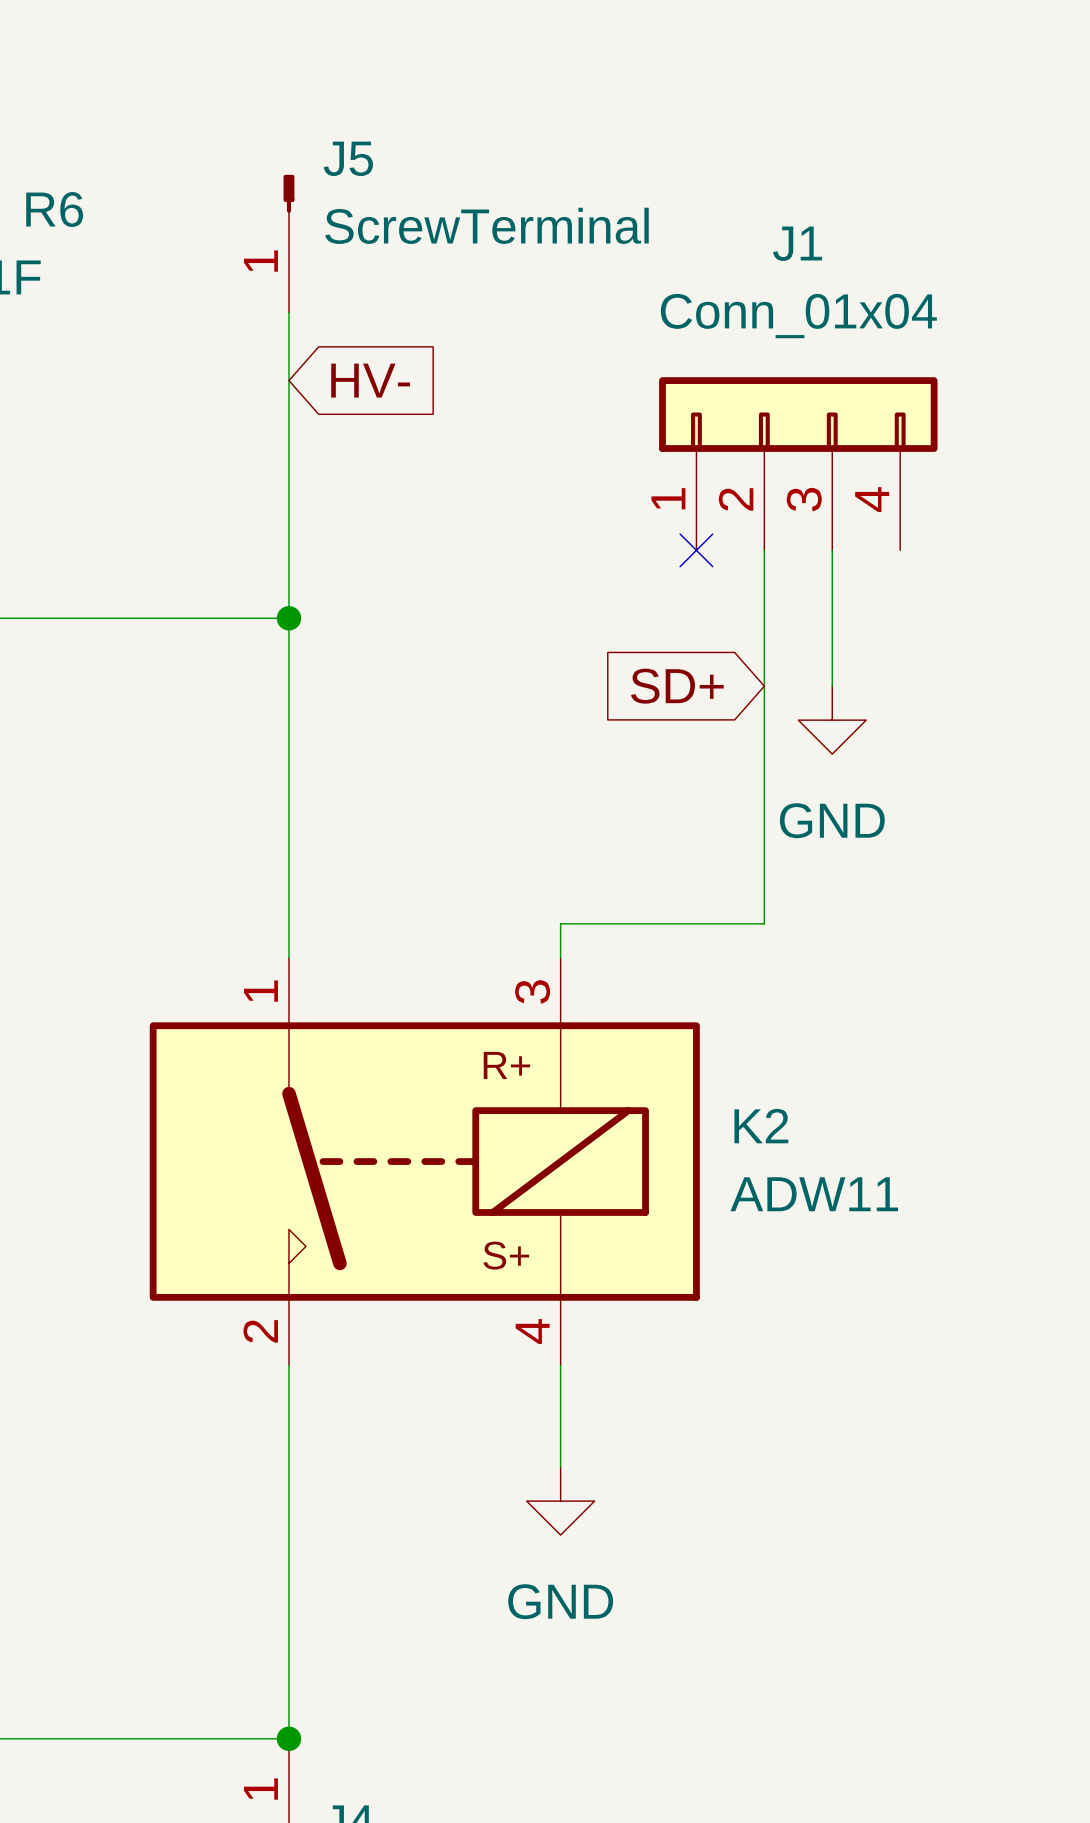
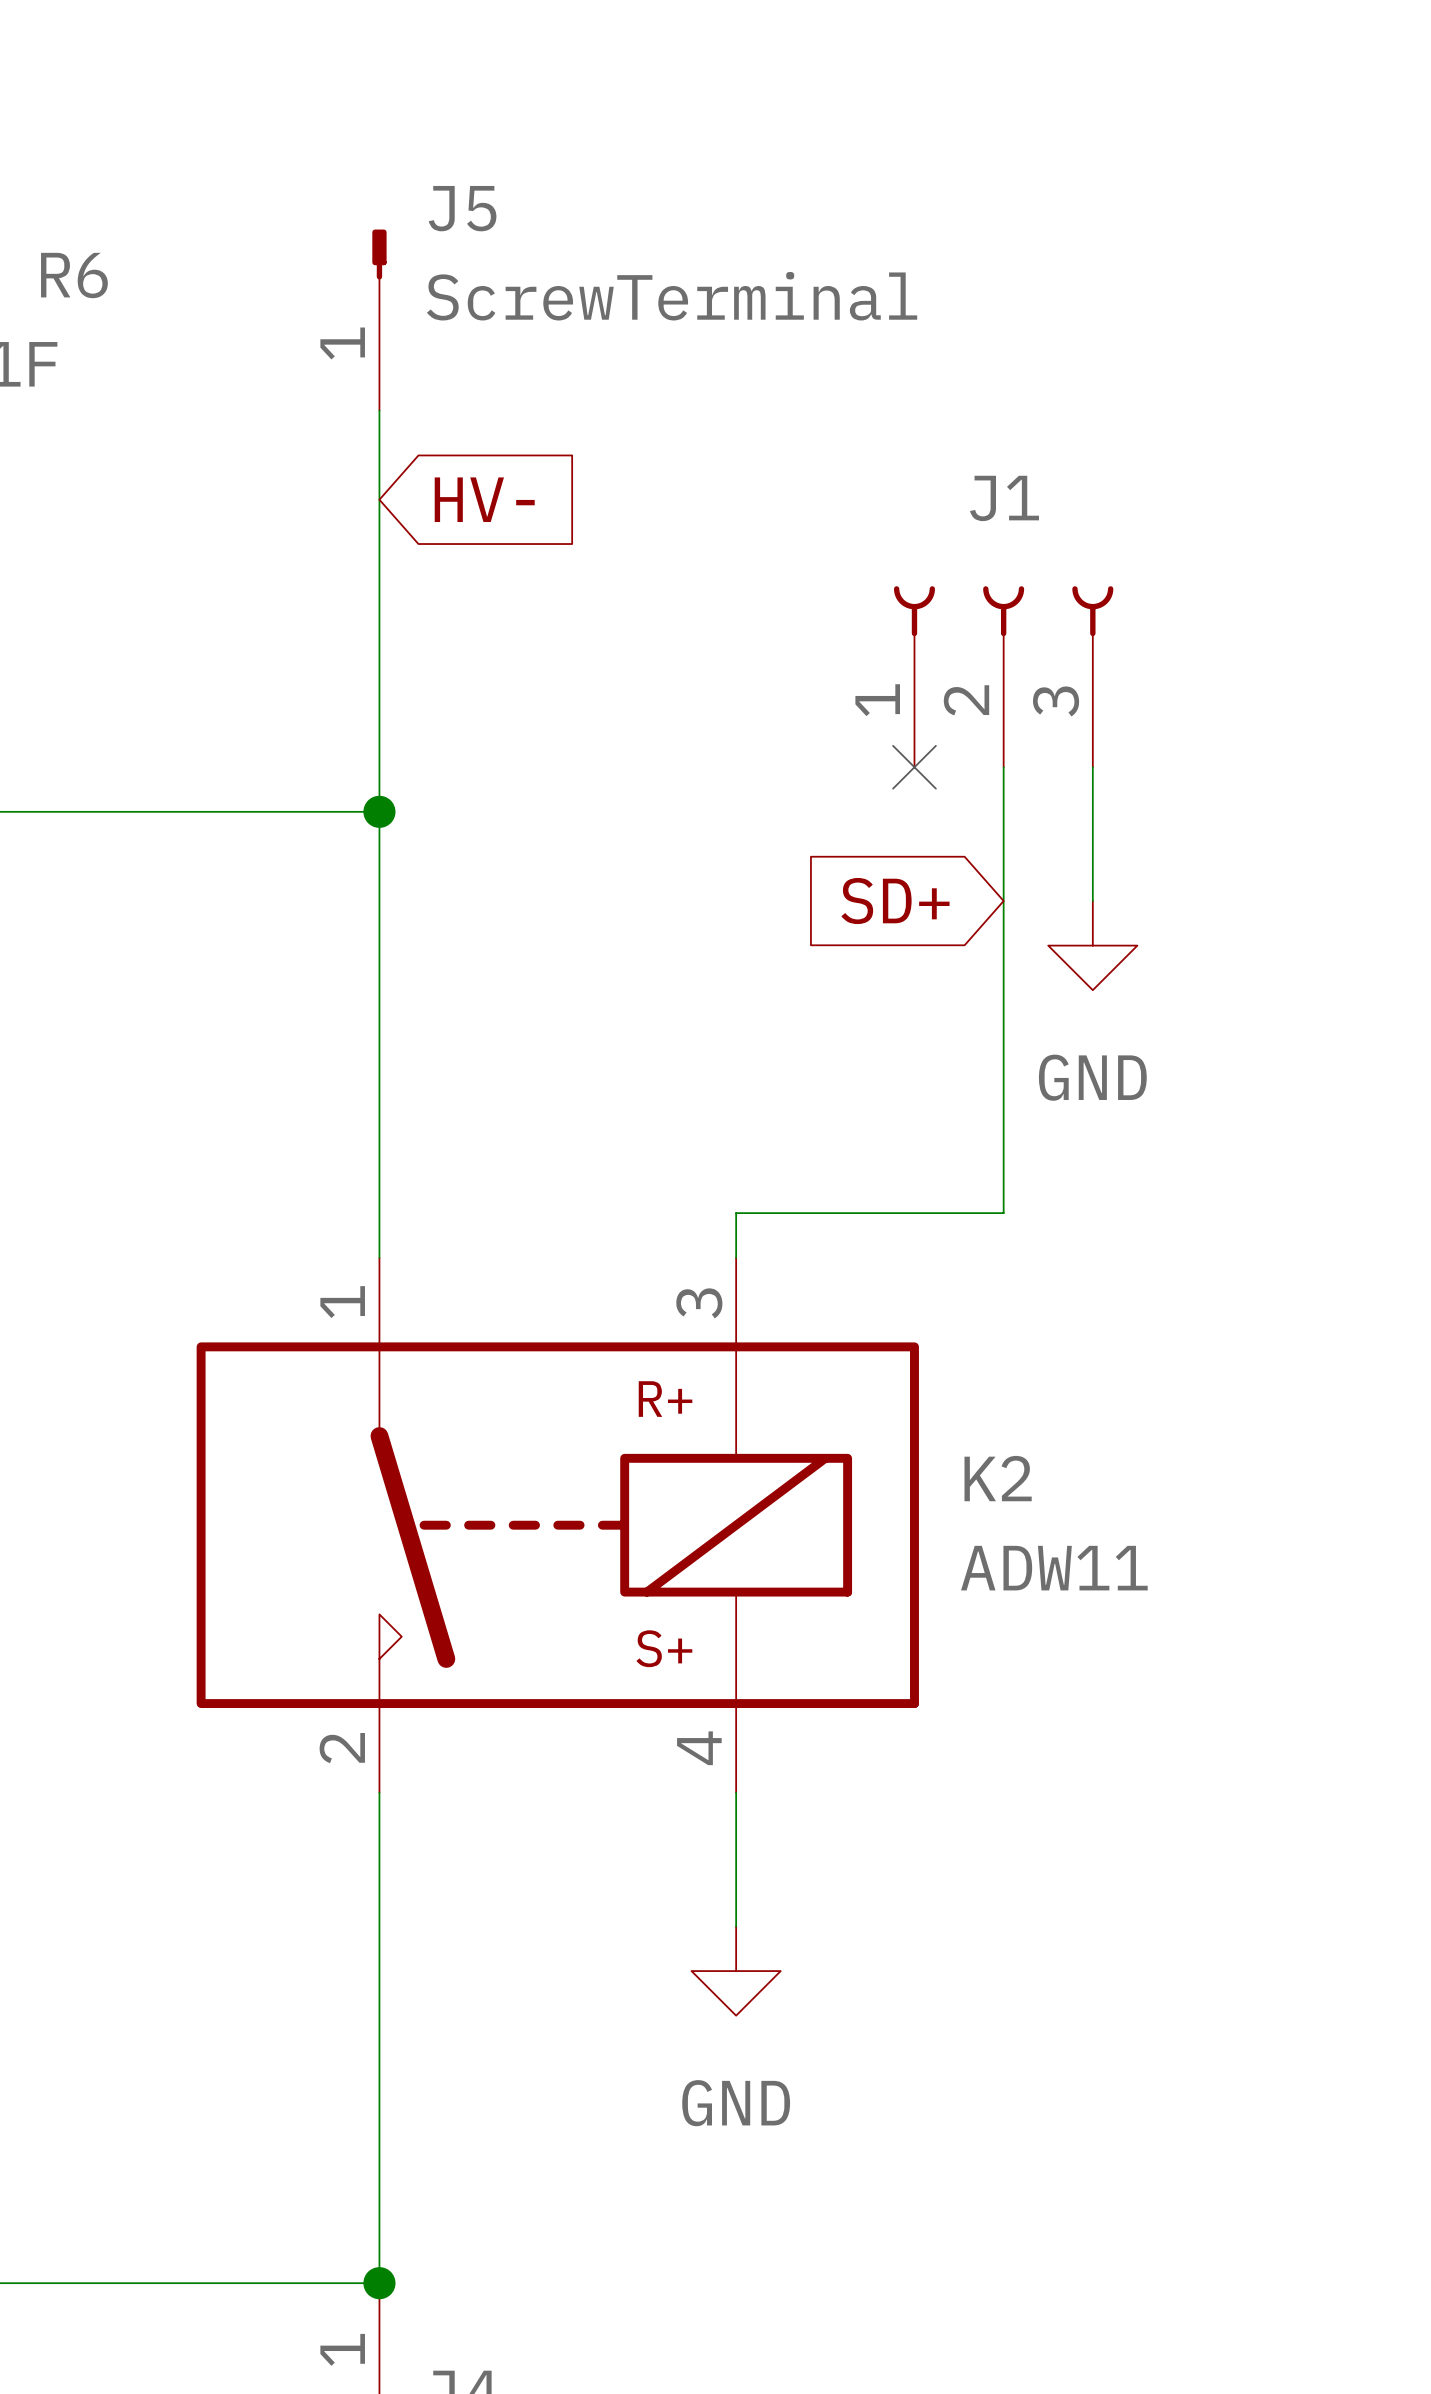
J1 name position: J1 (797, 243) -> J1 (1004, 498)
J1 value: Conn_01x04 (798, 316) -> none
J1 symbol: [659, 377, 938, 551] -> [893, 586, 1114, 768]
no-connect mark position: (696, 550) -> (914, 767)

